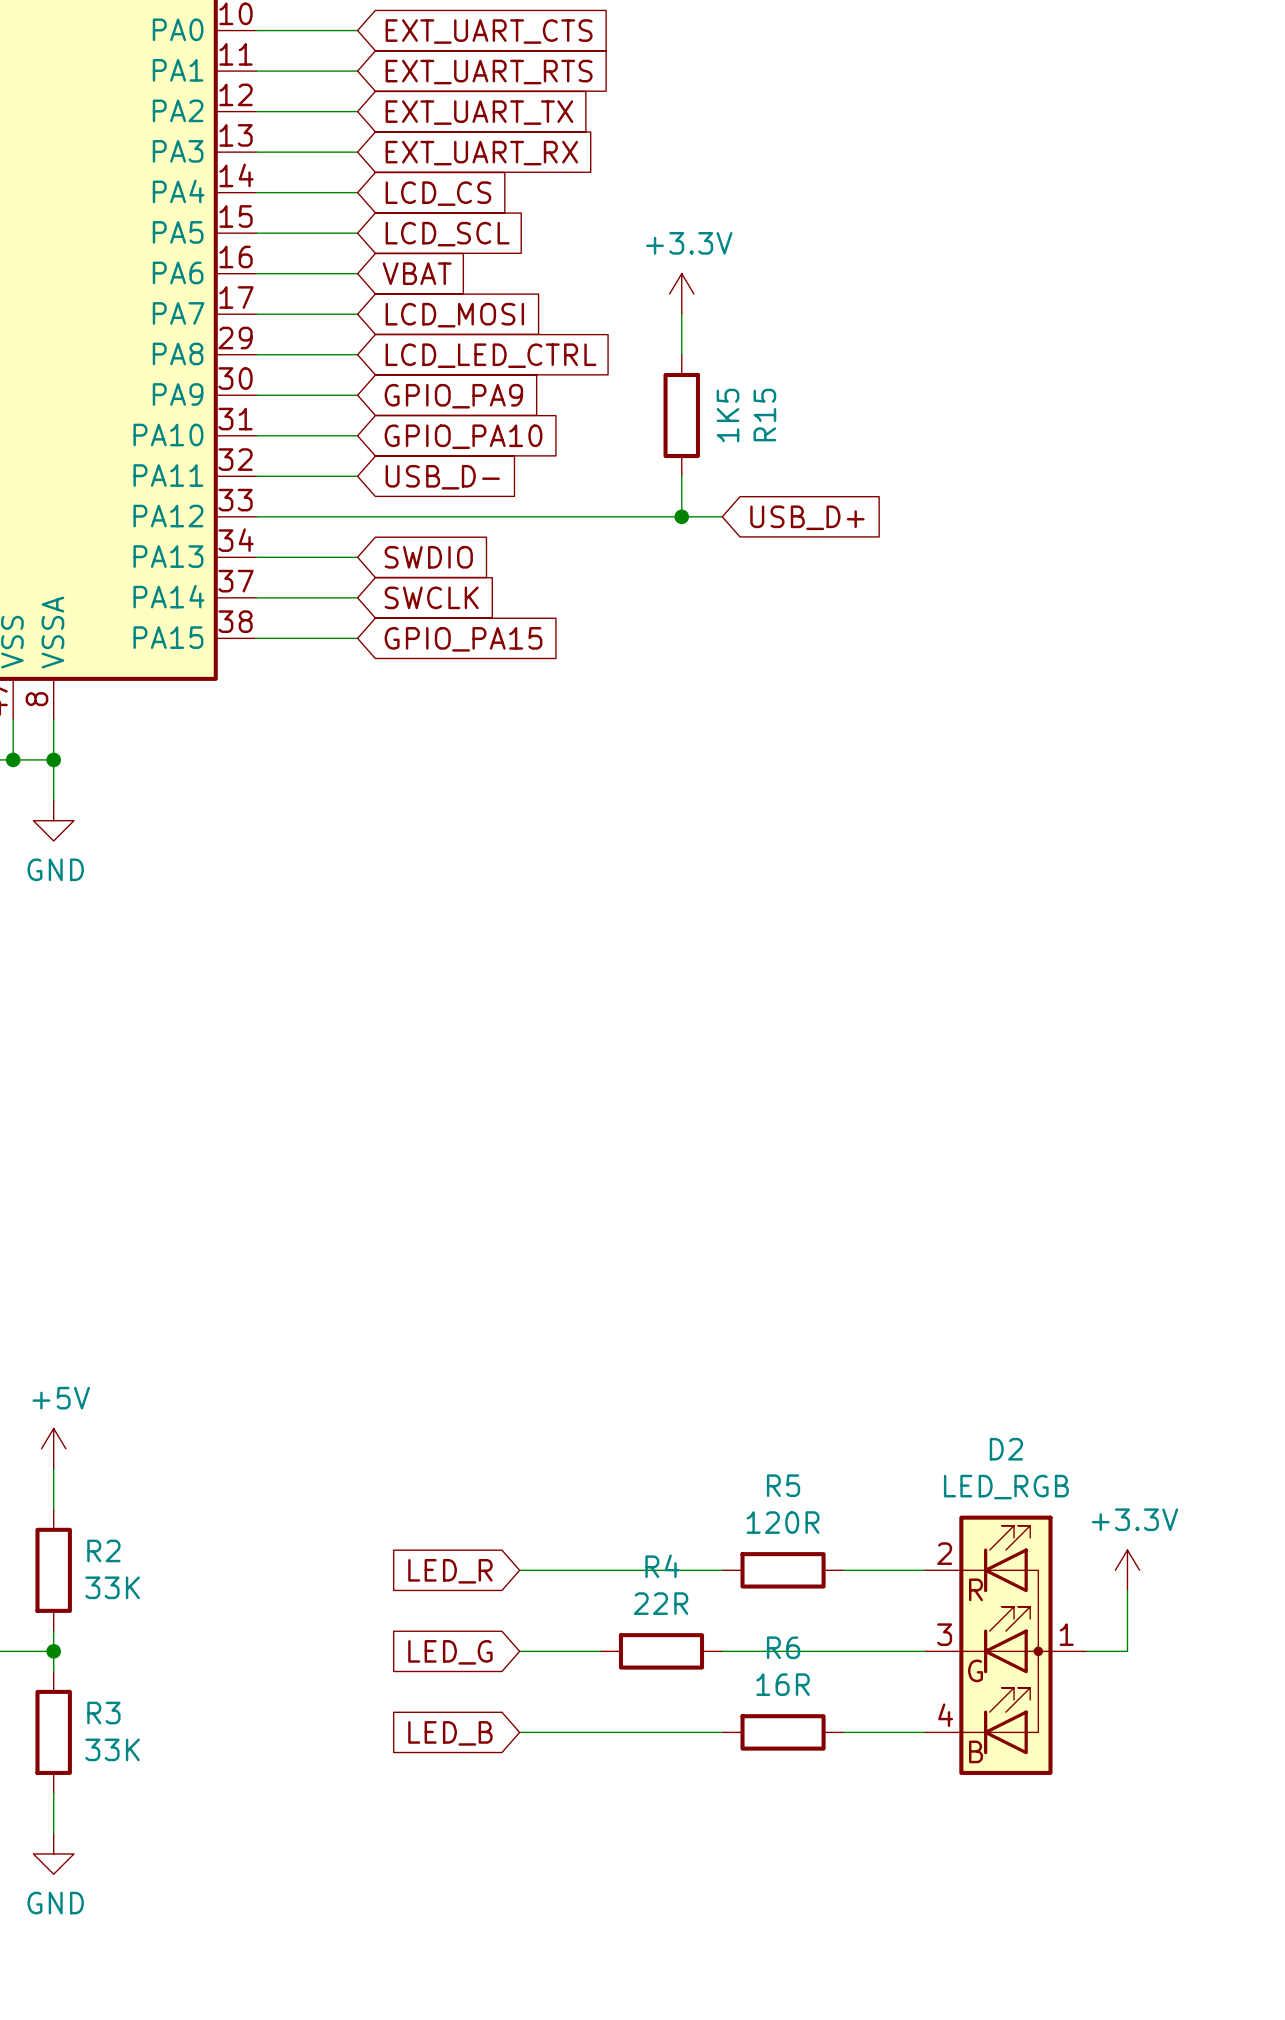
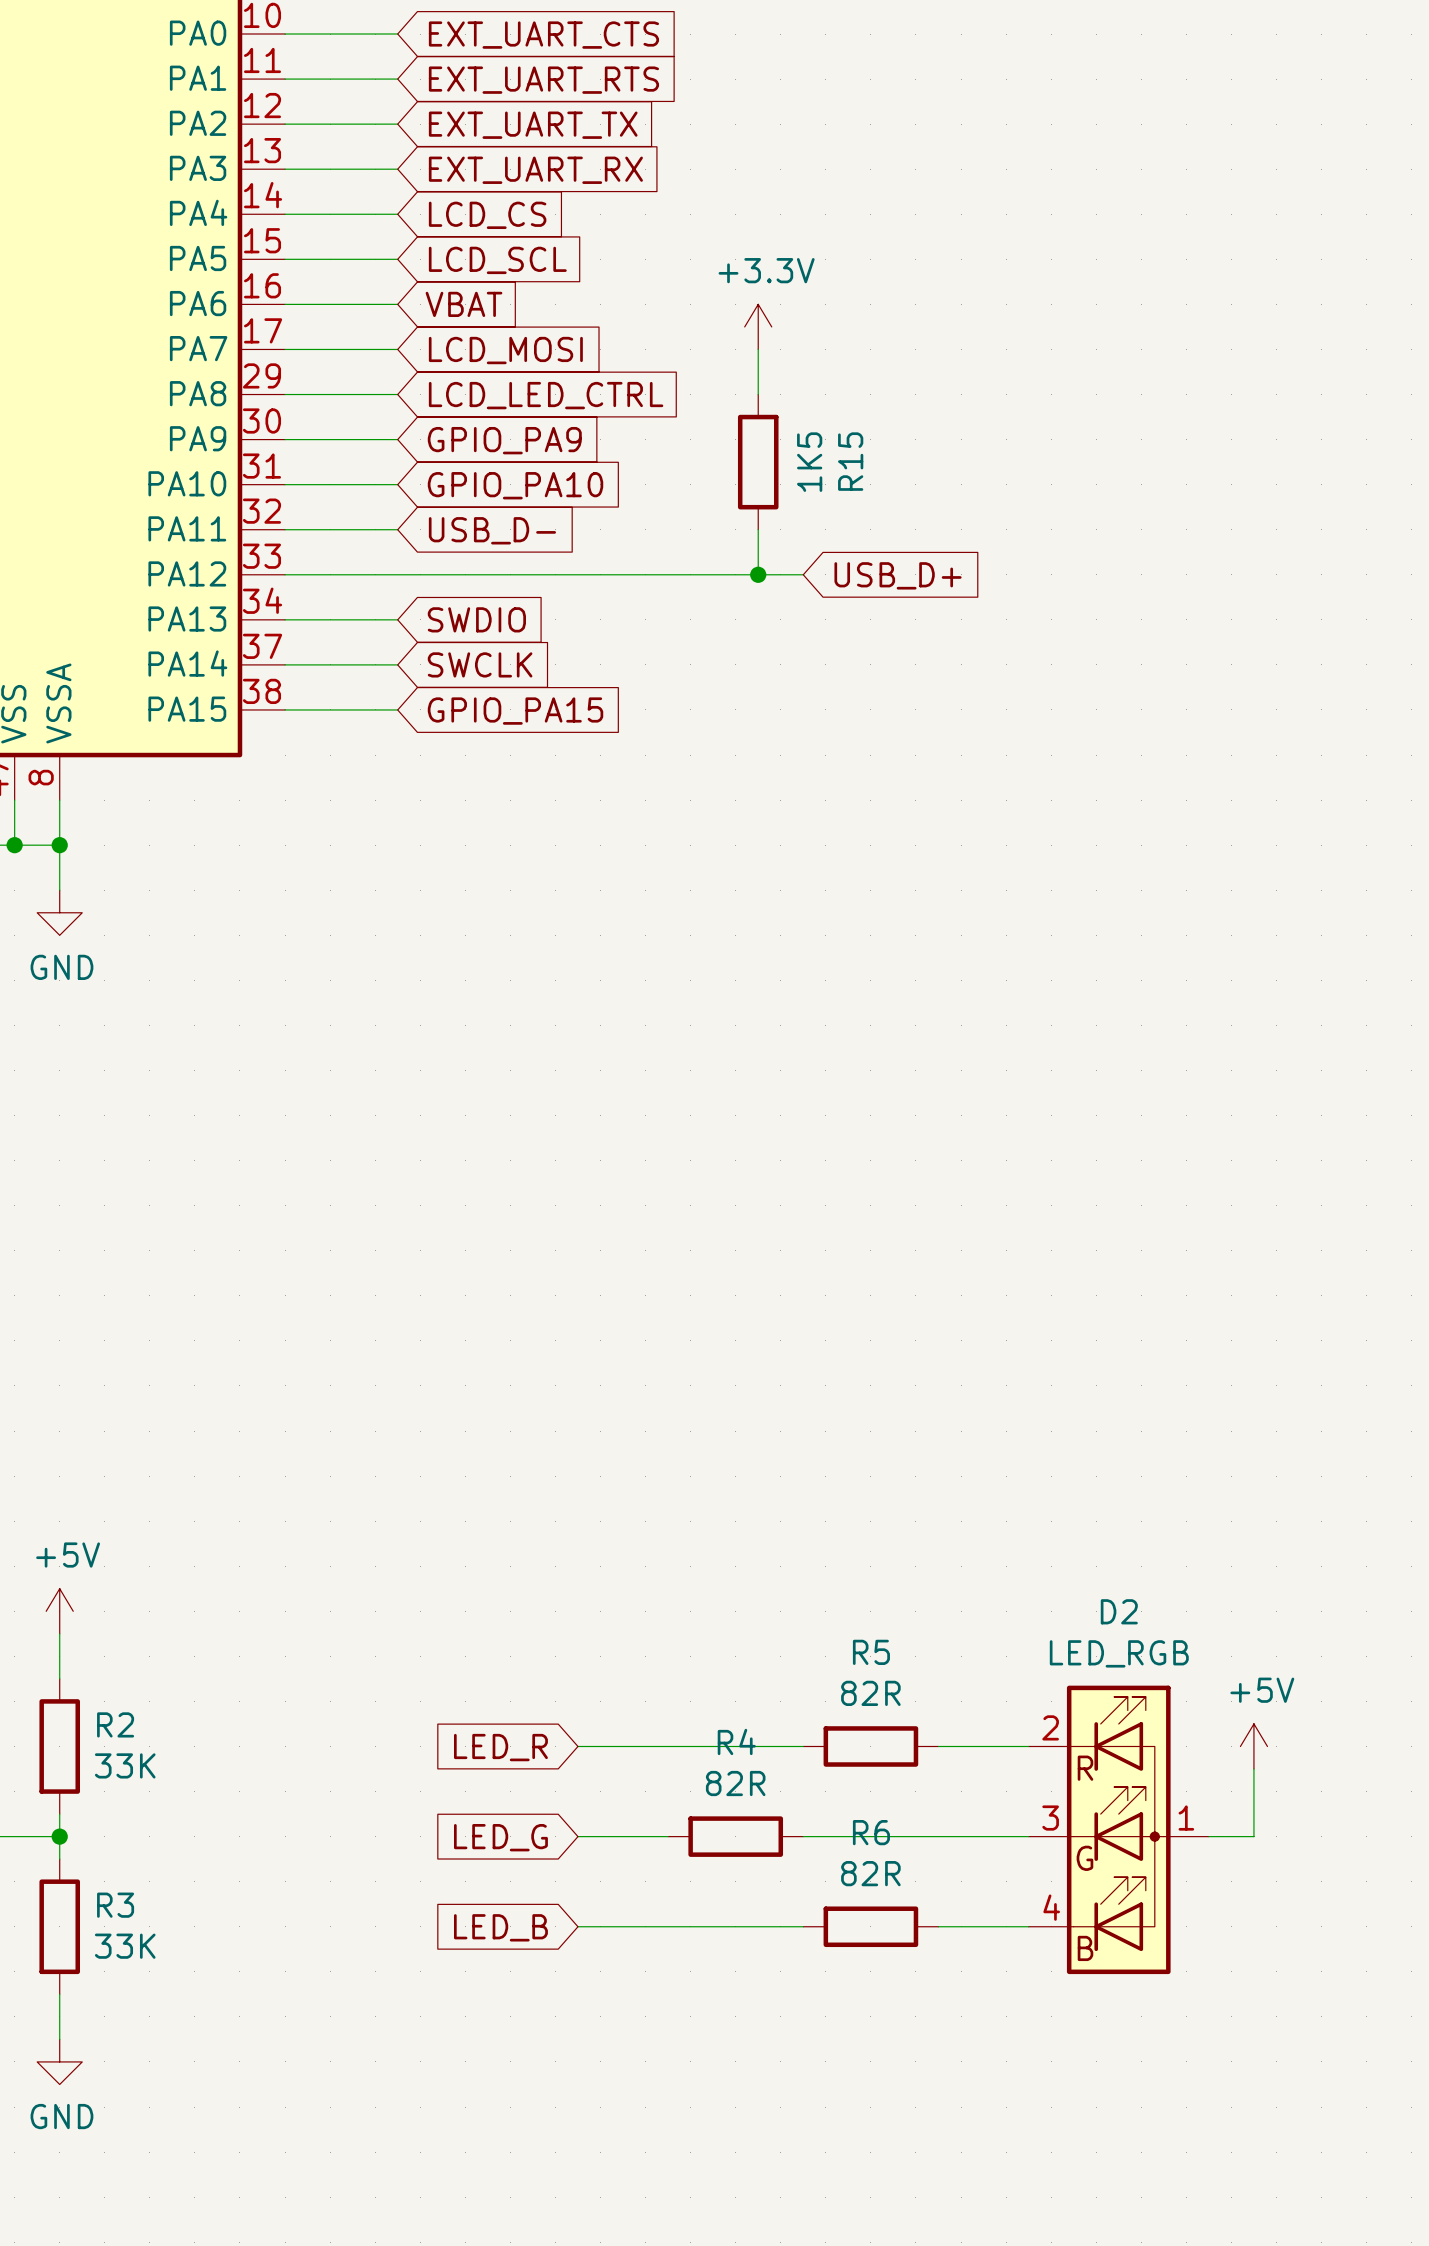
R5 value: 120R (783, 1522) -> 82R (870, 1693)
power symbol: +3.3V (1127, 1570) -> +5V (1253, 1746)
R4 value: 22R (661, 1603) -> 82R (735, 1783)
R6 value: 16R (783, 1684) -> 82R (870, 1873)

